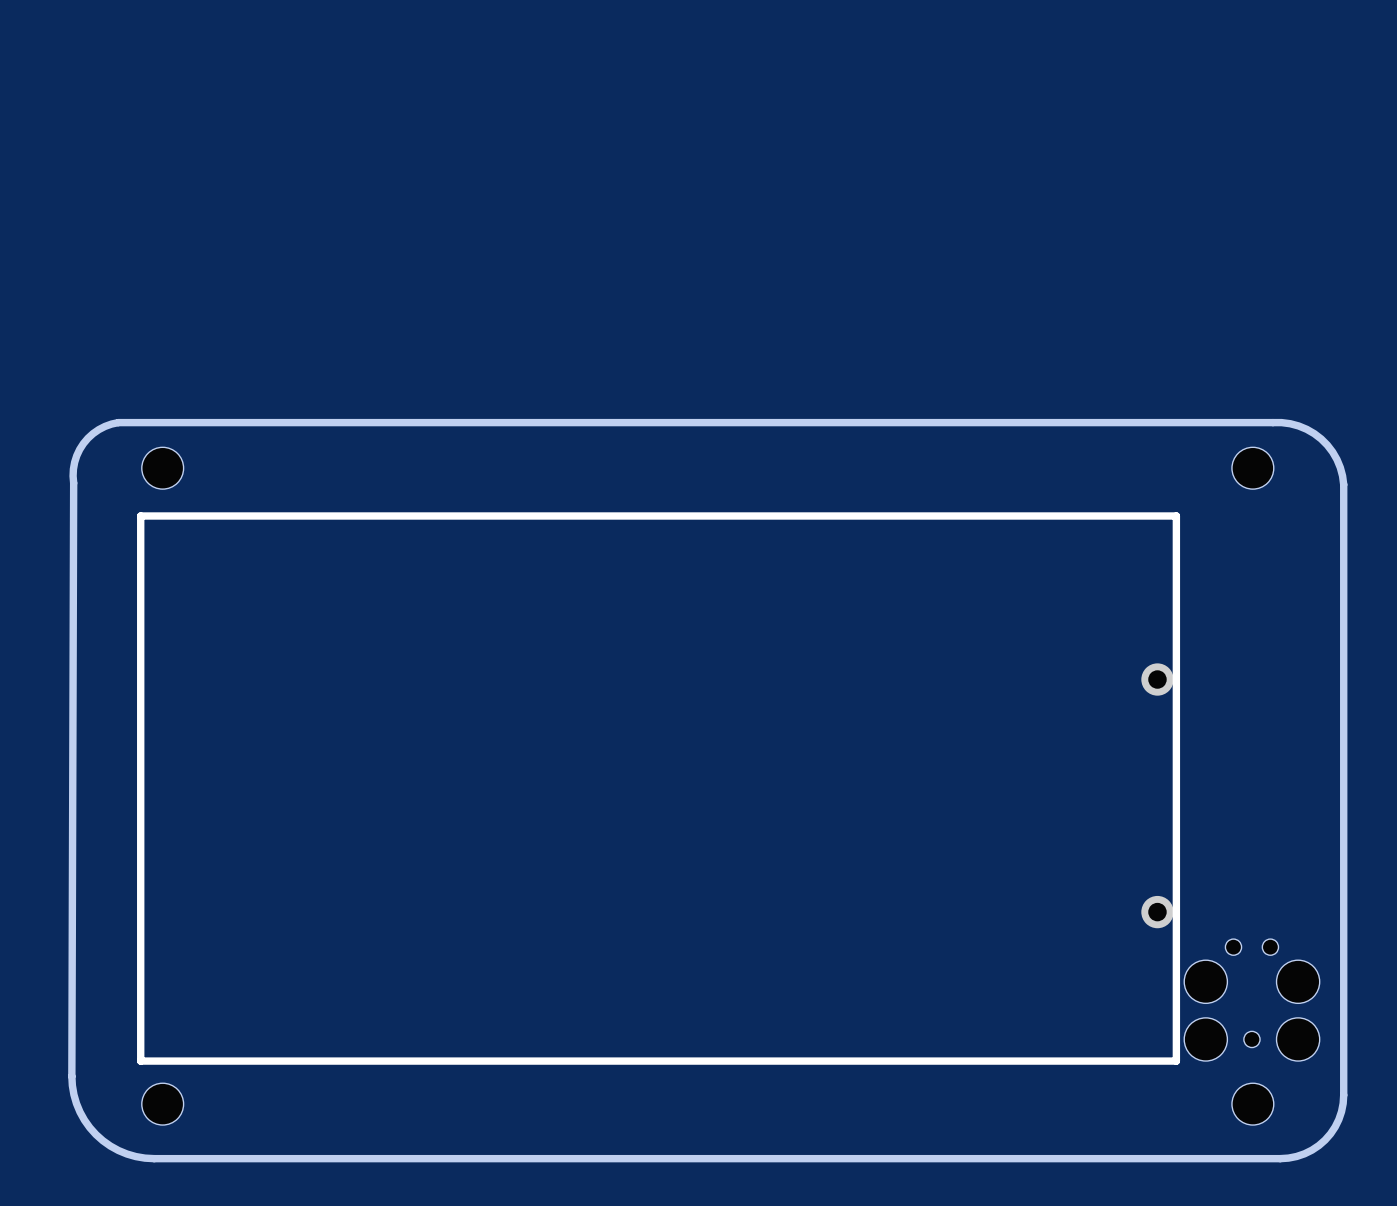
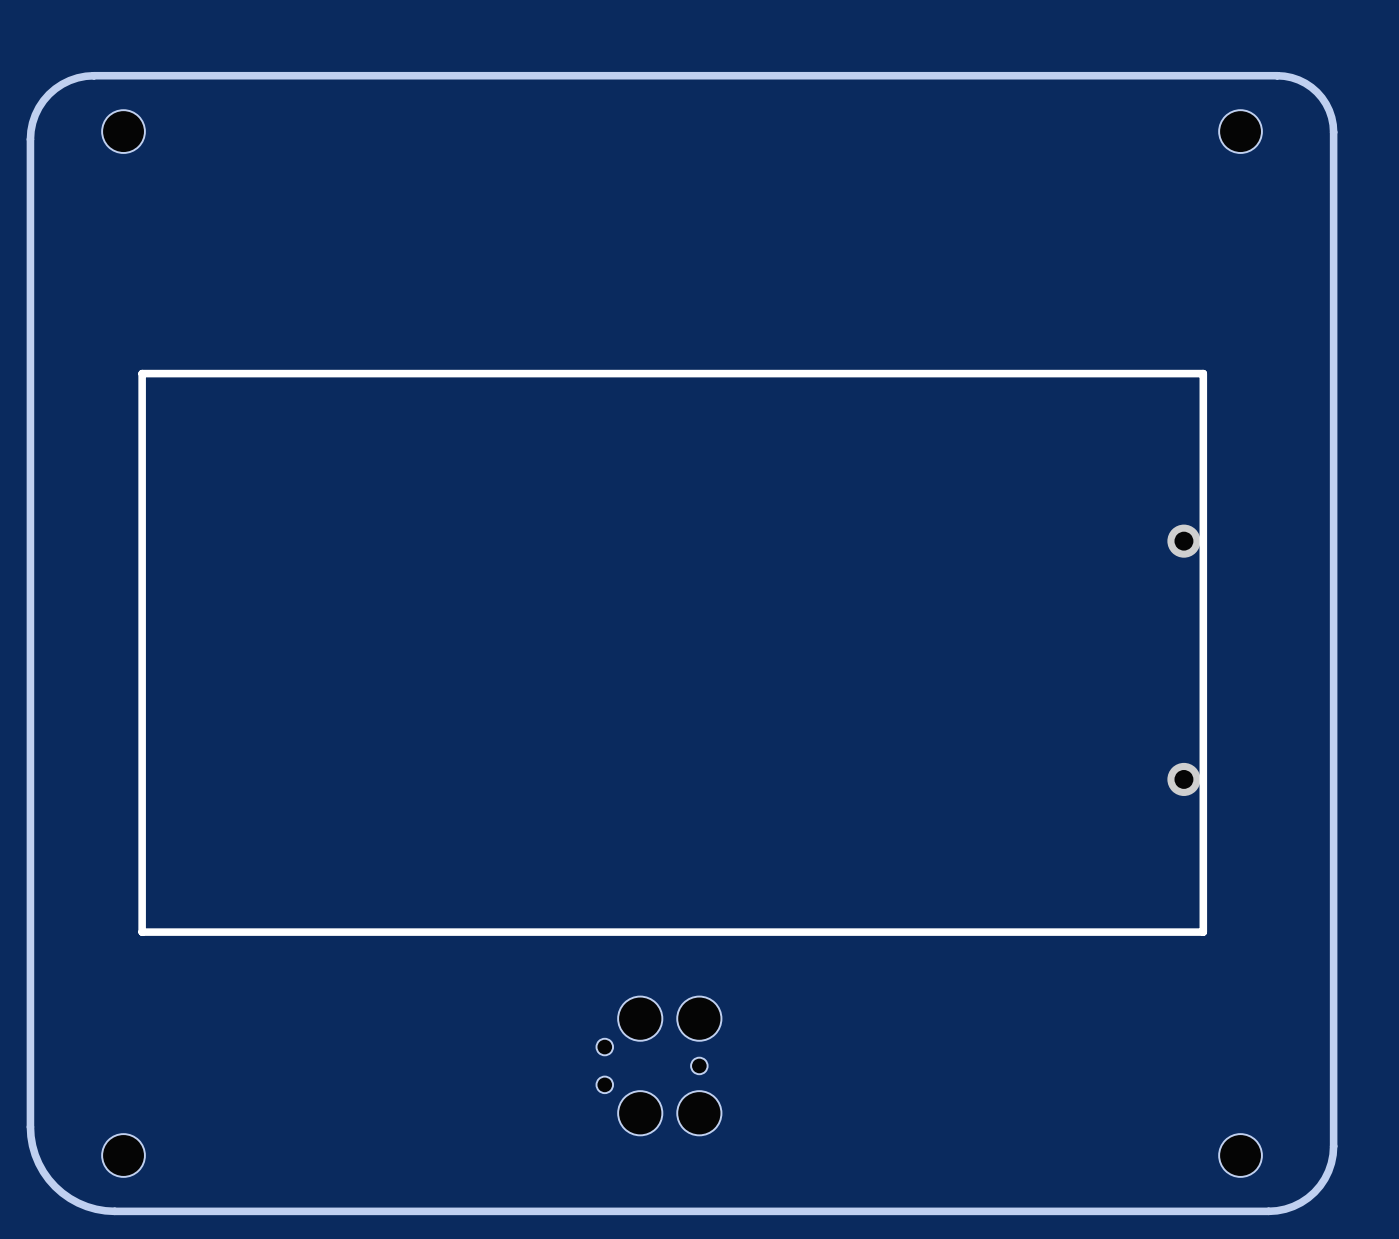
hole position: (162, 468) -> (123, 131)
hole position: (1252, 468) -> (1240, 131)
board edge: (1343, 484) (1336, 459) (1321, 438) (1298, 425) (1281, 422) (118, 422) (104, 426) (93, 433) (83, 443) (76, 455) (73, 469) (71, 1076) -> (1333, 520) (1333, 124) (1329, 110) (1321, 97) (1311, 87) (1298, 80) (1277, 75) (94, 75) (69, 80) (49, 94) (38, 107) (32, 122) (30, 139) (30, 1127)
part: none -> (1183, 541)
line: (1176, 515) (140, 515) (140, 1061) (1176, 1061) (1176, 515) -> (1203, 373) (142, 373) (142, 932) (1203, 932) (1203, 373)
part position: (1157, 679) -> (1183, 779)
part: (1157, 912) -> none
part: (1251, 1000) -> none
part: none -> (658, 1065)

